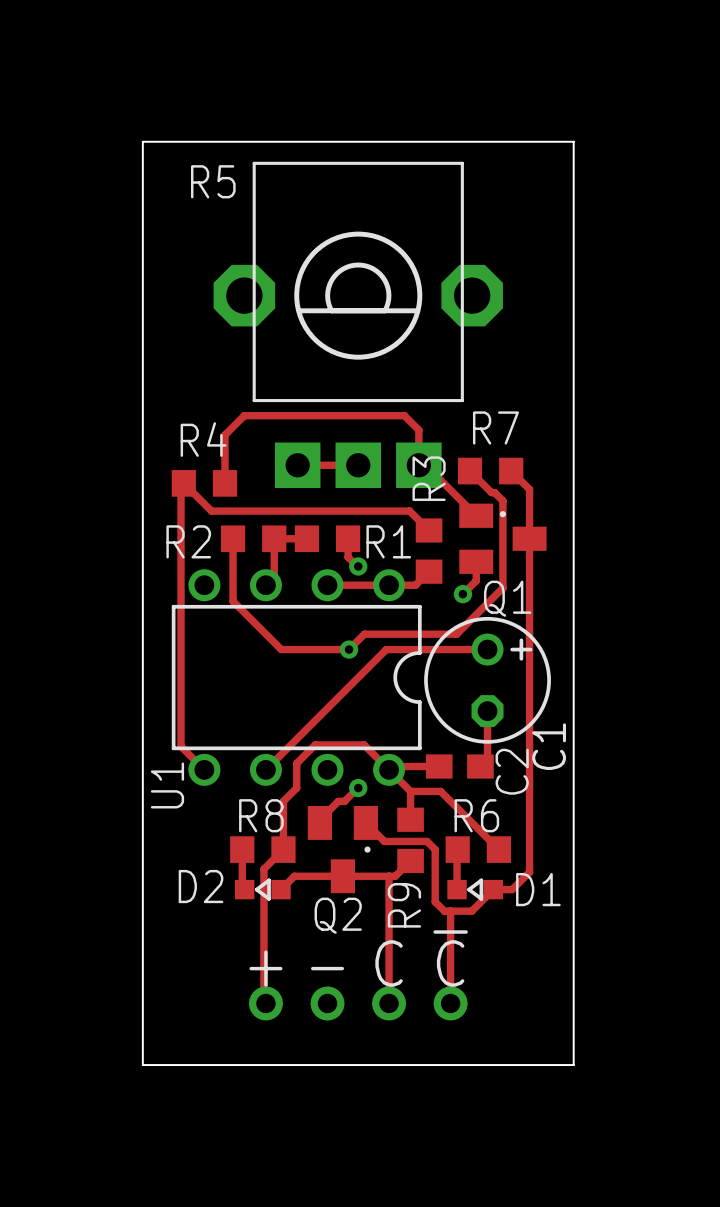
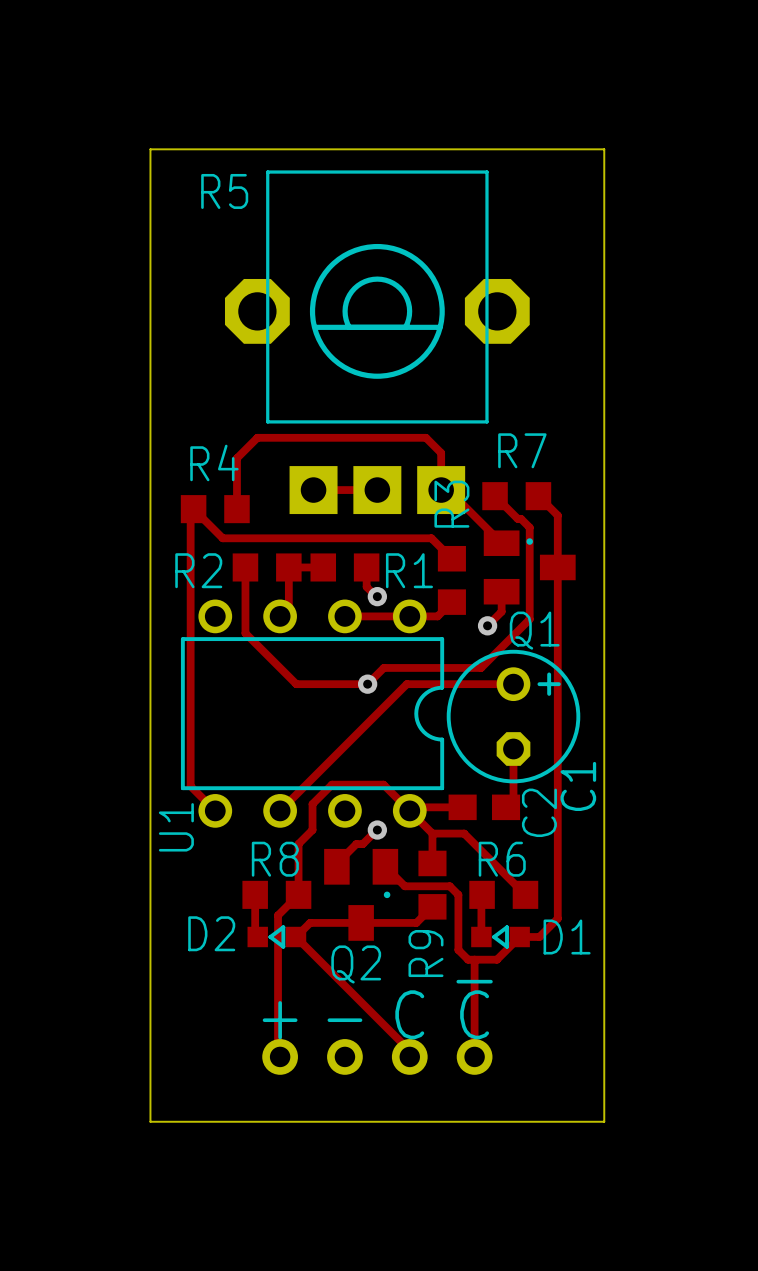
track: (389, 876) (389, 997) -> (296, 937) (409, 1050)

